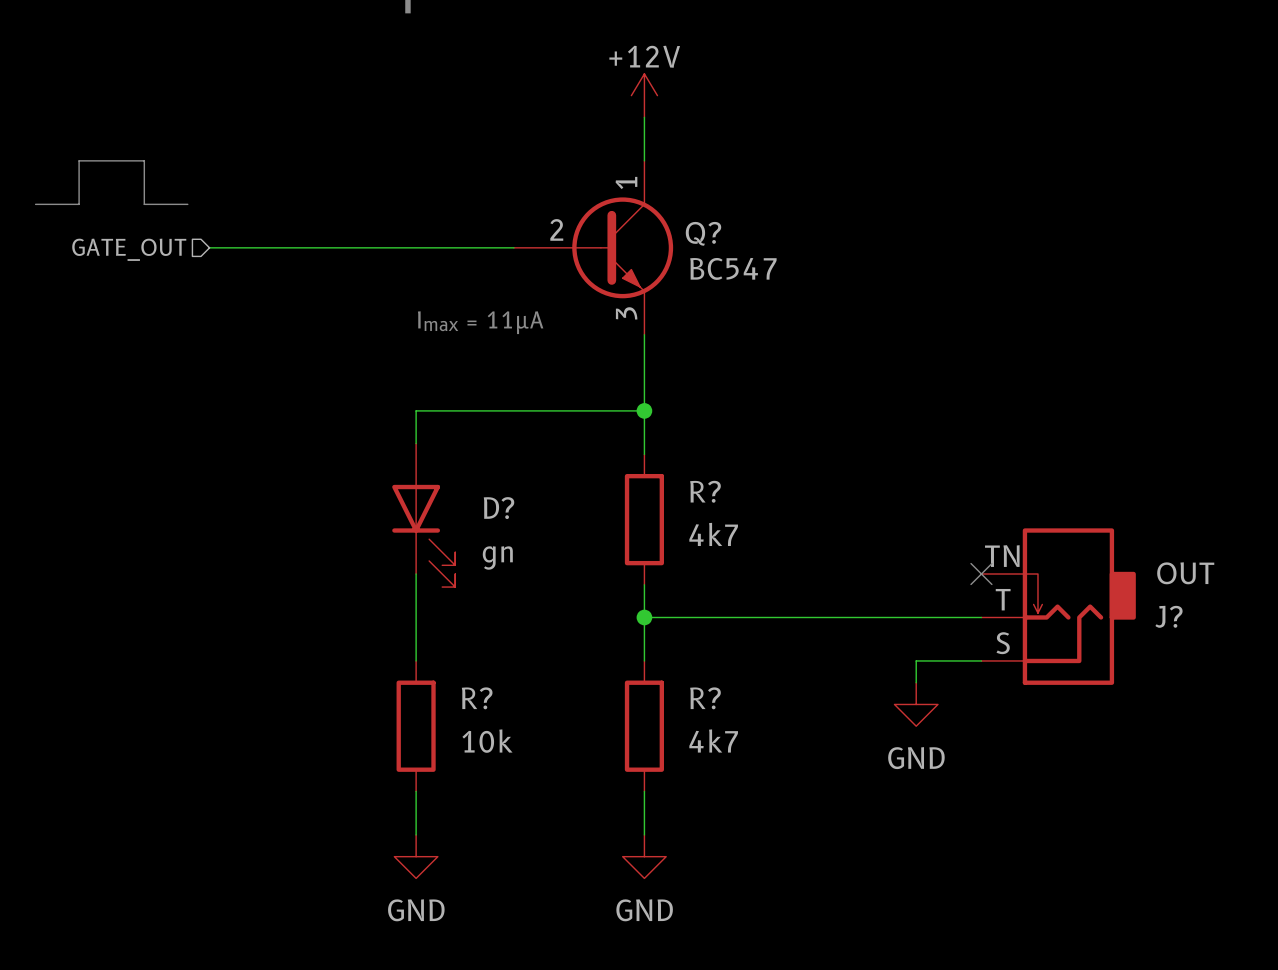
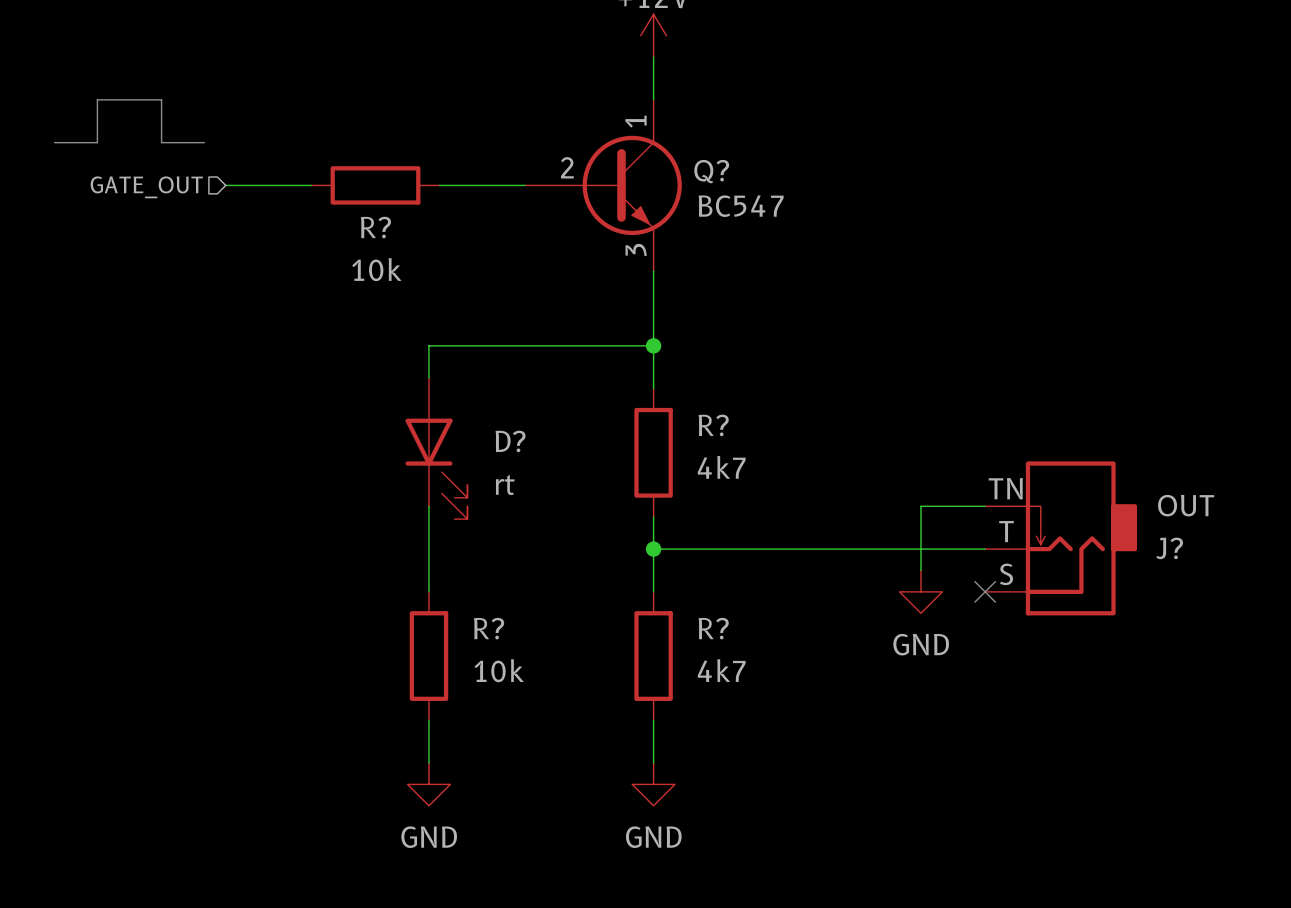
wire: (296, 247) (426, 247) -> none
R?: none -> 10k (375, 185)
text: Imax = 11µA (480, 322) -> none
D? value: gn (497, 558) -> rt (505, 484)
wire: none -> (985, 506) (920, 506) (920, 570)
no-connect mark position: (981, 574) -> (985, 591)
wire: (981, 660) (916, 660) (916, 682) -> none
power symbol position: GND (916, 704) -> GND (920, 591)

